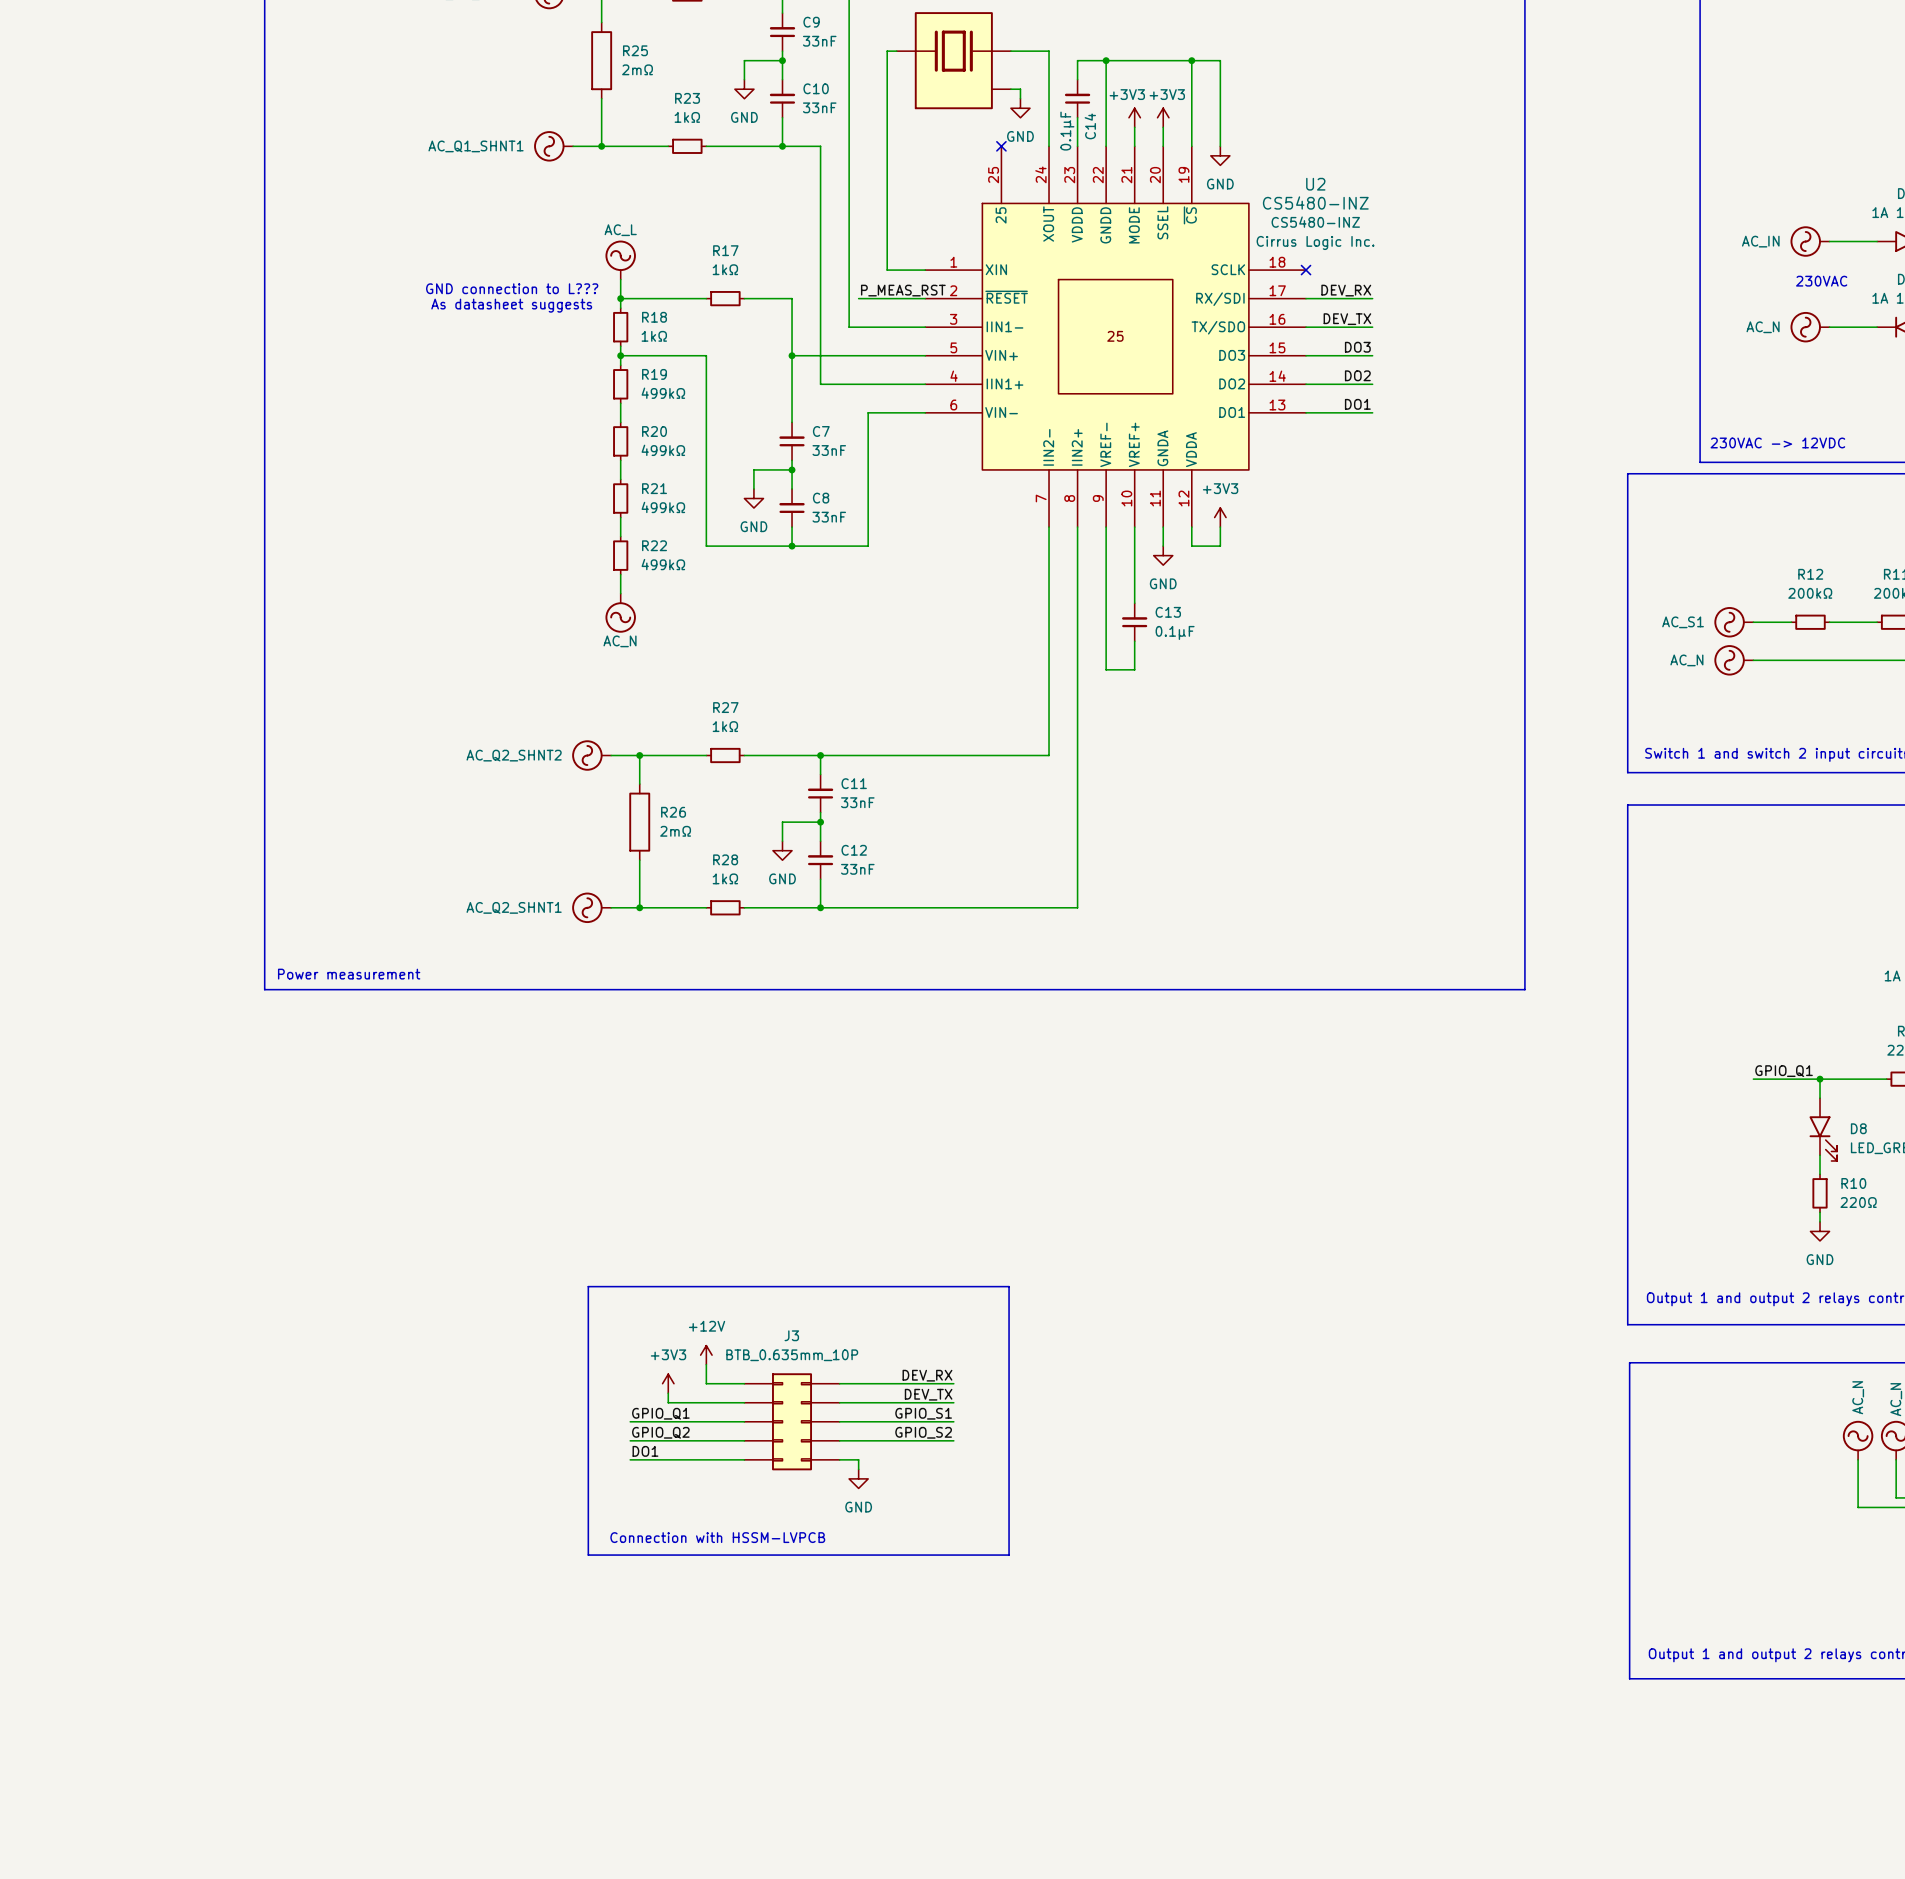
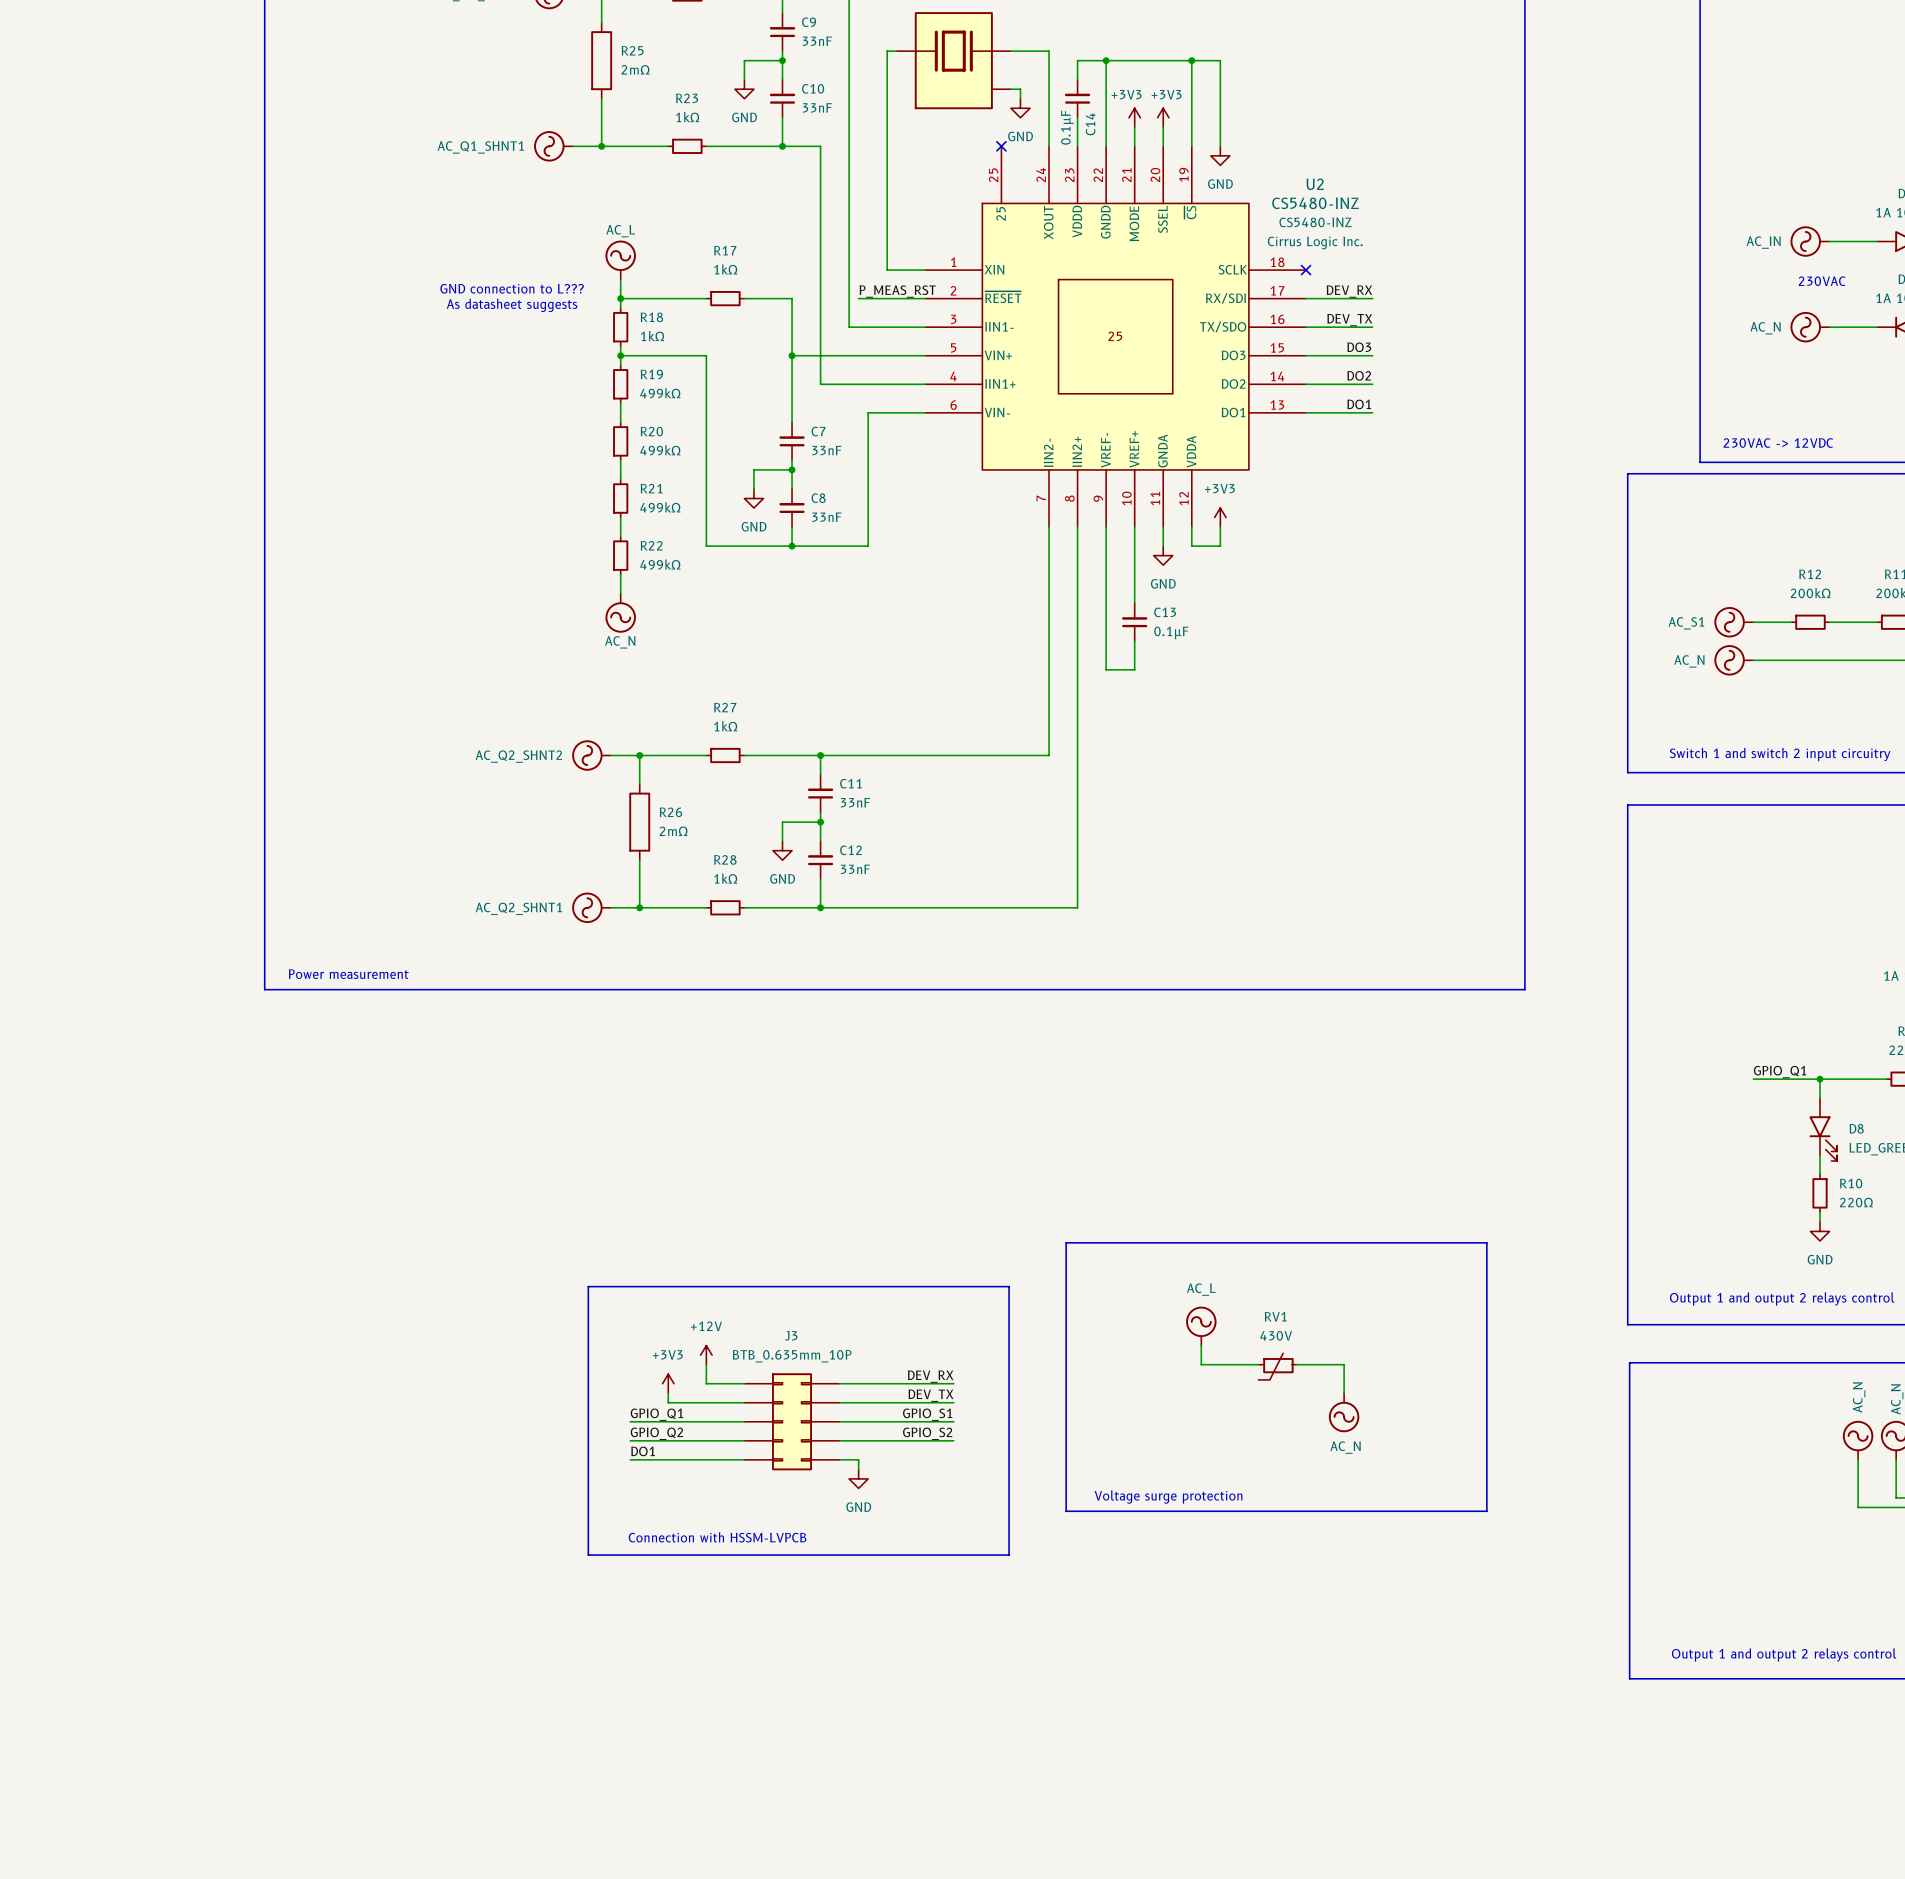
line: none -> (1066, 1242) (1486, 1242) (1486, 1511) (1066, 1511) (1066, 1242)
power symbol: none -> AC_L (1201, 1326)
wire: none -> (1201, 1345) (1201, 1364) (1258, 1364)
wire: none -> (1296, 1364) (1344, 1364) (1344, 1393)
RV1: none -> (1277, 1366)
power symbol: none -> AC_N (1344, 1412)
text: none -> Voltage surge protection (1168, 1497)

